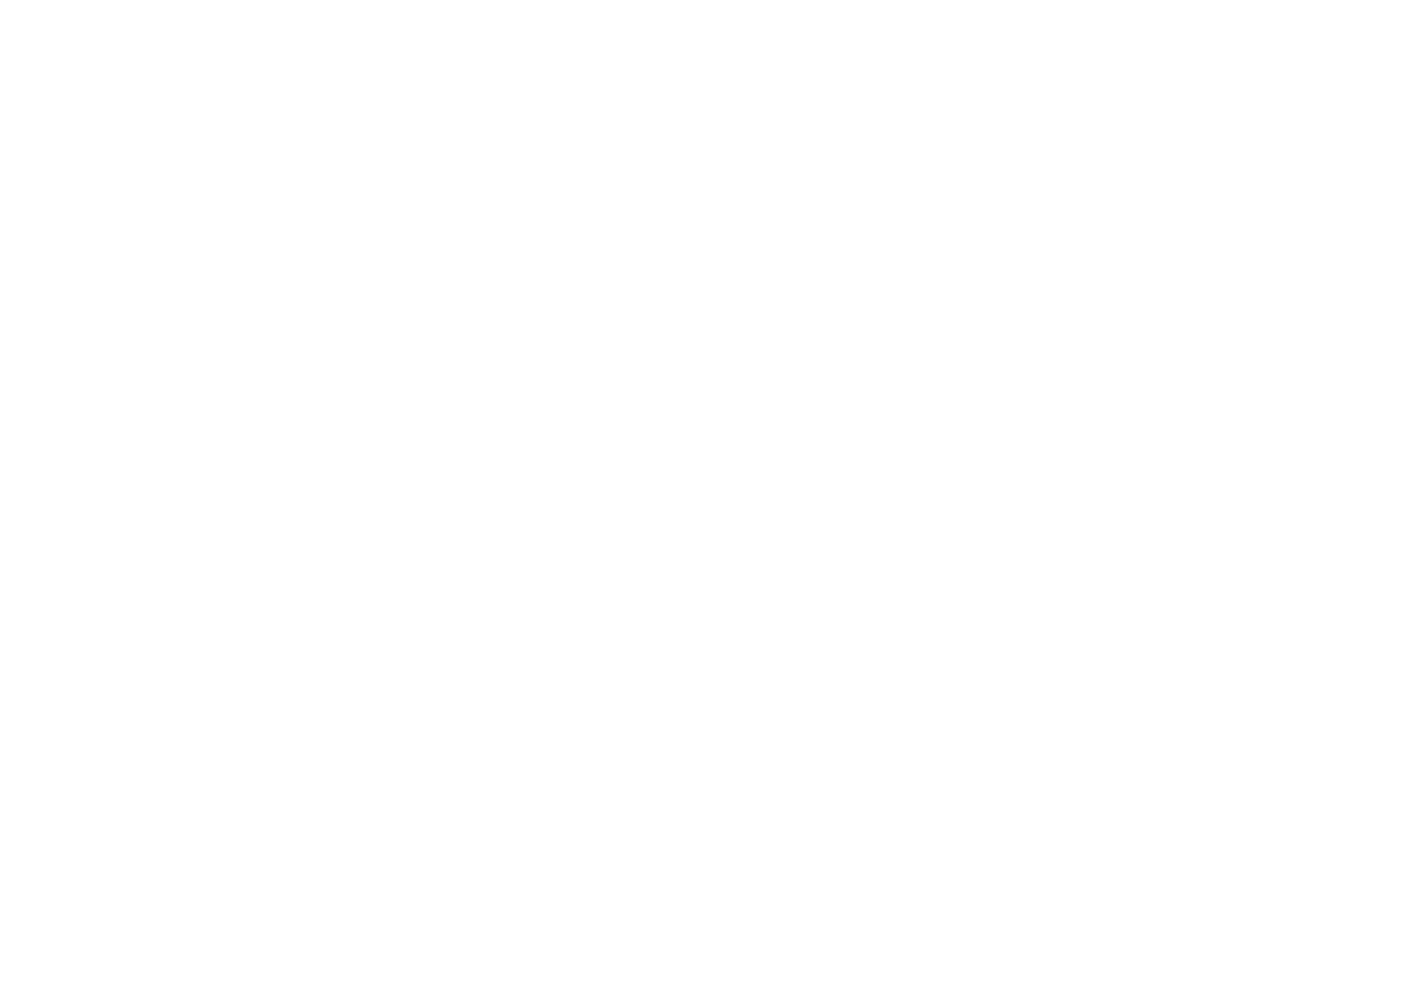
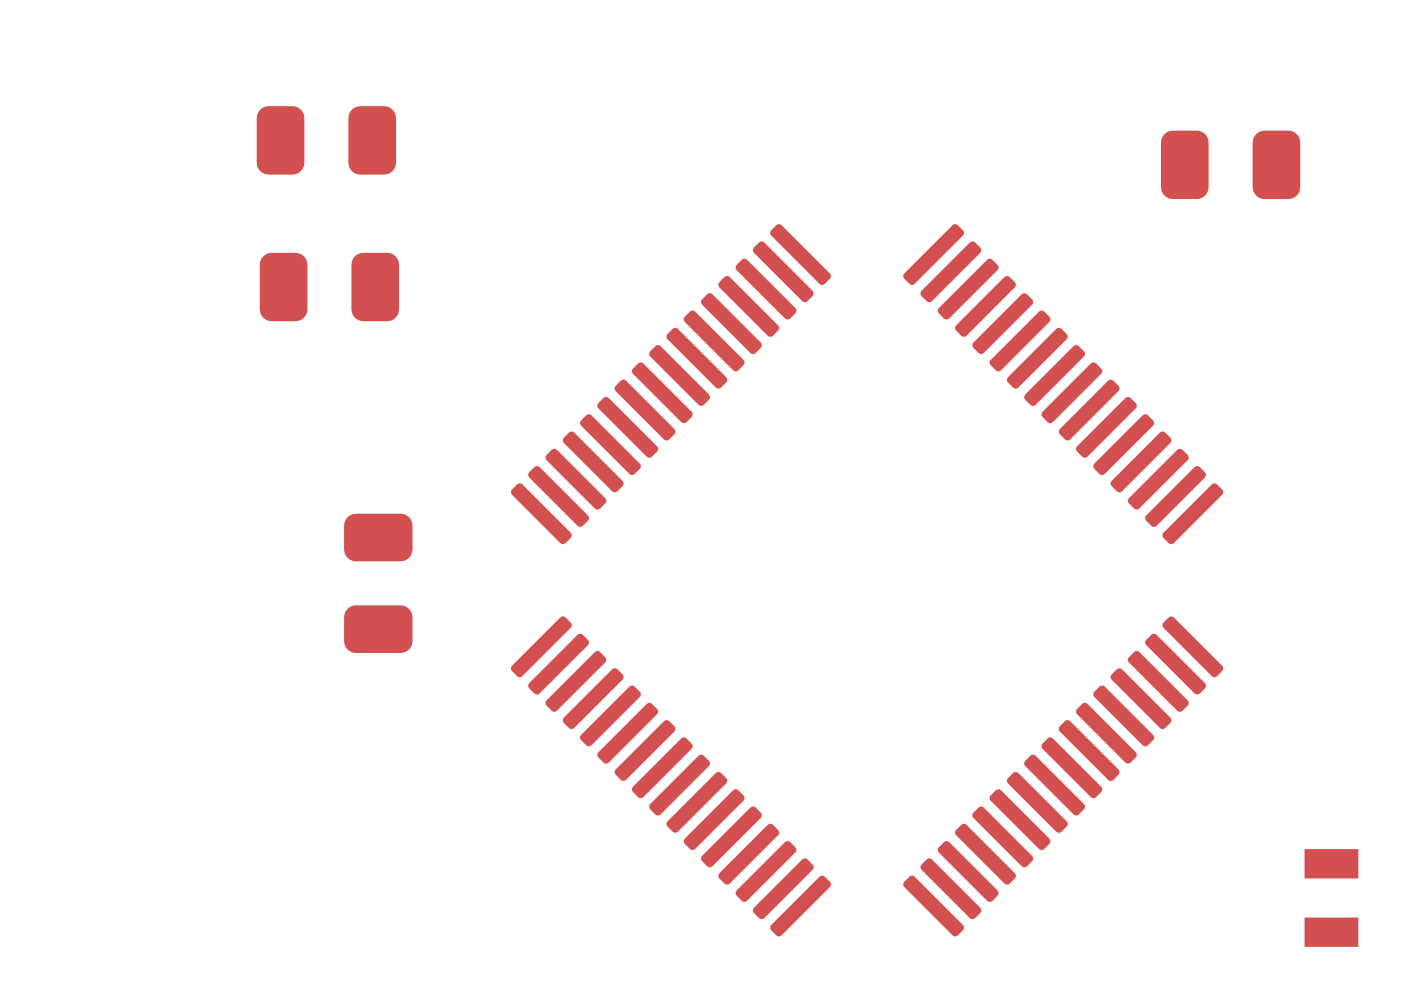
part: none -> (326, 140)
part: none -> (1230, 164)
part: none -> (329, 287)
part: none -> (867, 580)
part: none -> (378, 583)
part: none -> (1331, 898)

